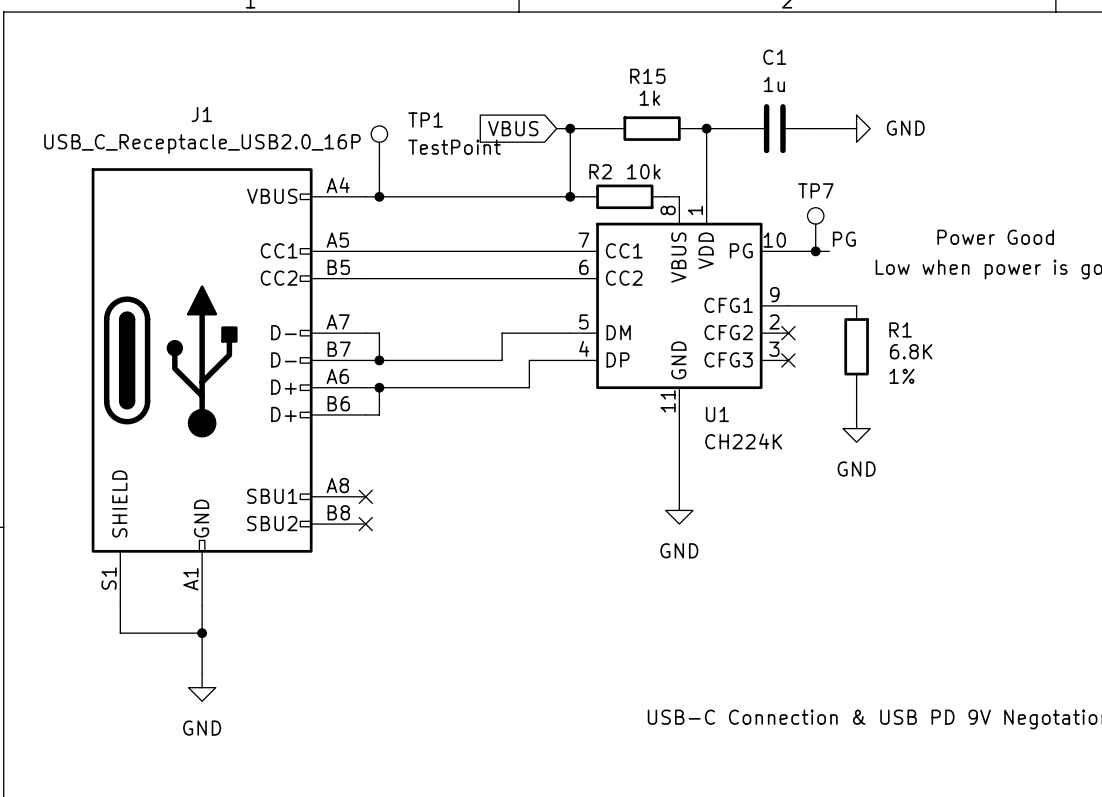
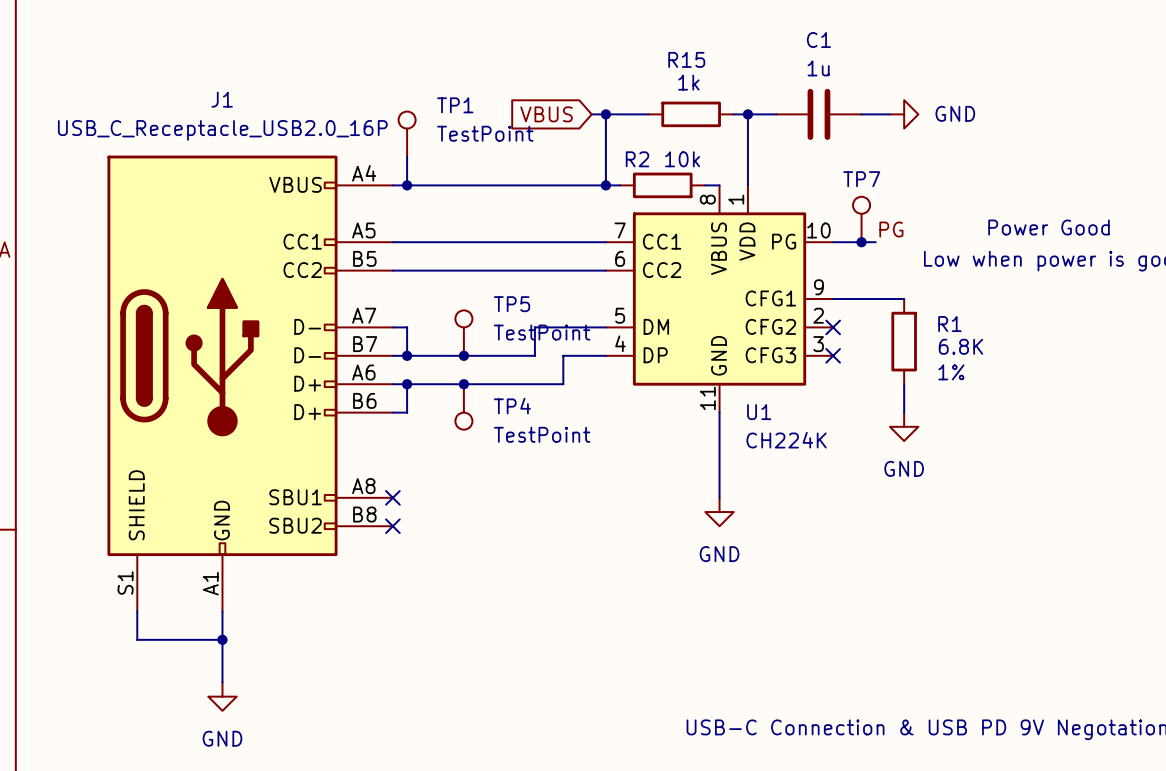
TP5: none -> TestPoint (463, 333)
junction: none -> (463, 355)
junction: none -> (463, 384)
TP4: none -> TestPoint (463, 406)

